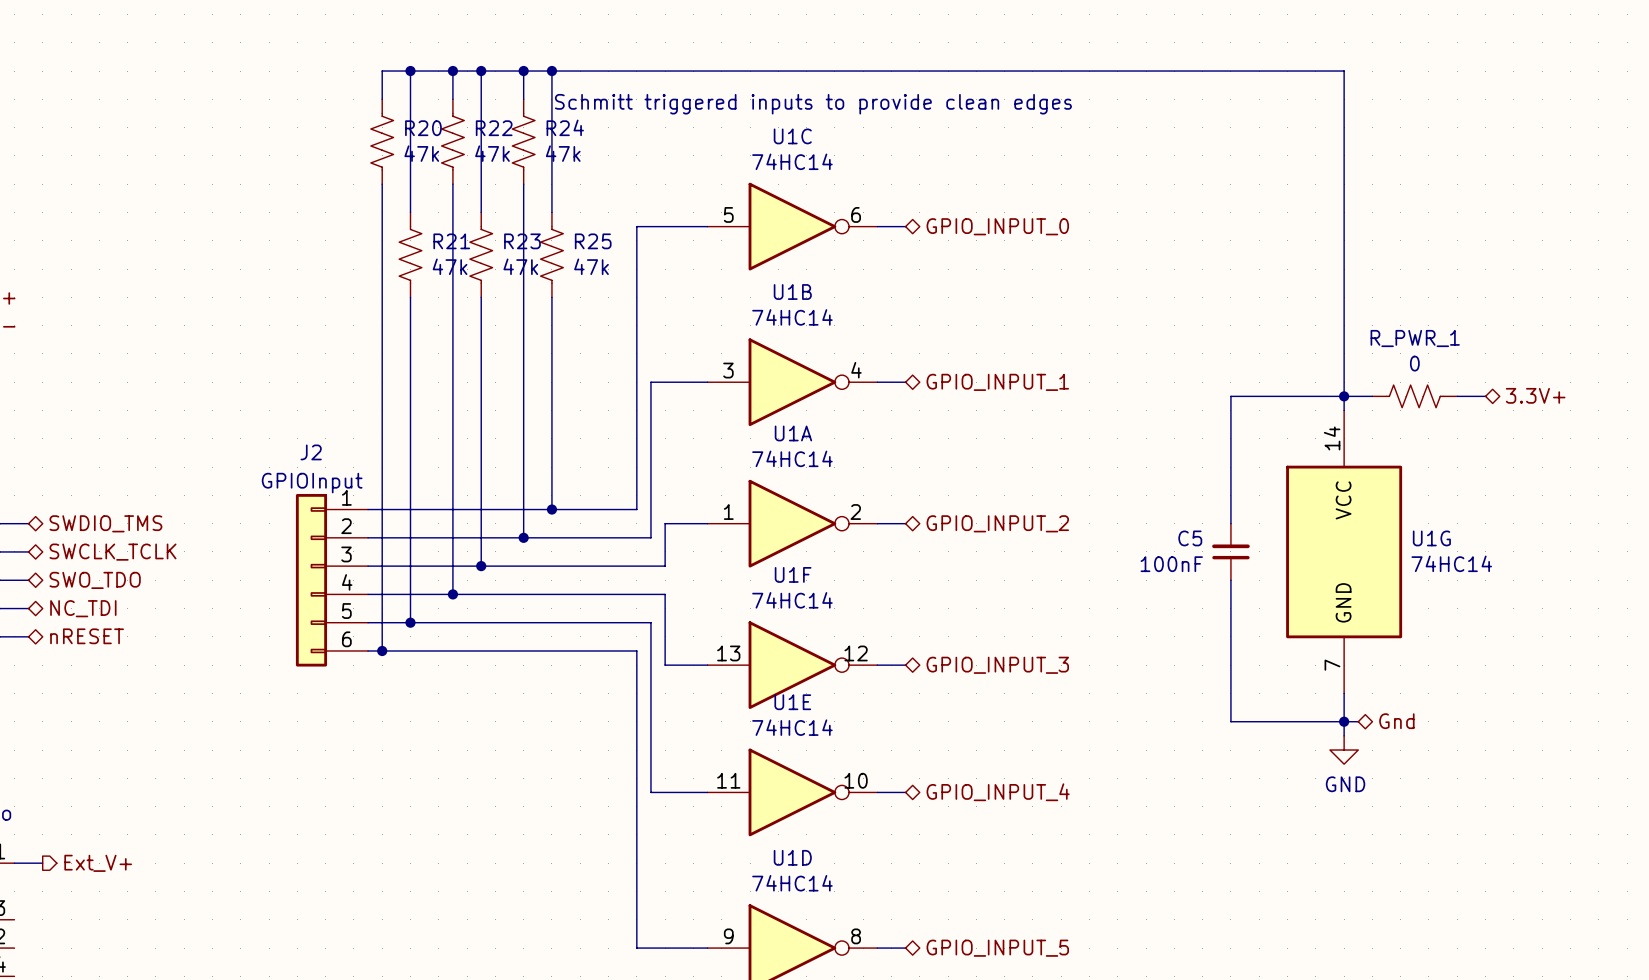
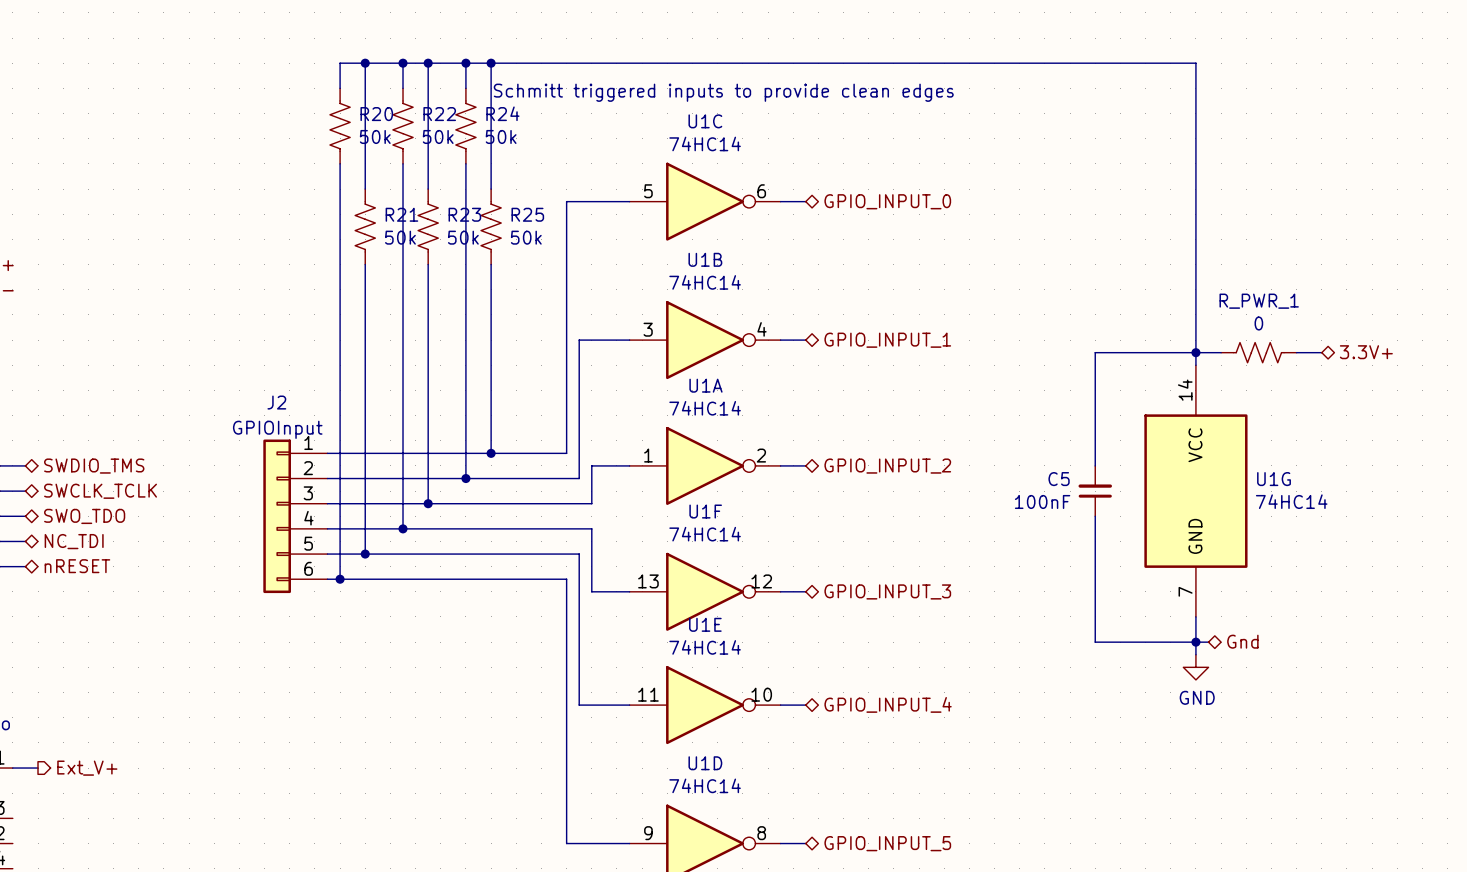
R20 value: 47k (421, 153) -> 50k (375, 136)
R22 value: 47k (492, 153) -> 50k (438, 136)
R24 value: 47k (563, 153) -> 50k (501, 136)
R21 value: 47k (450, 266) -> 50k (400, 237)
R23 value: 47k (520, 266) -> 50k (463, 237)
R25 value: 47k (591, 266) -> 50k (526, 237)

